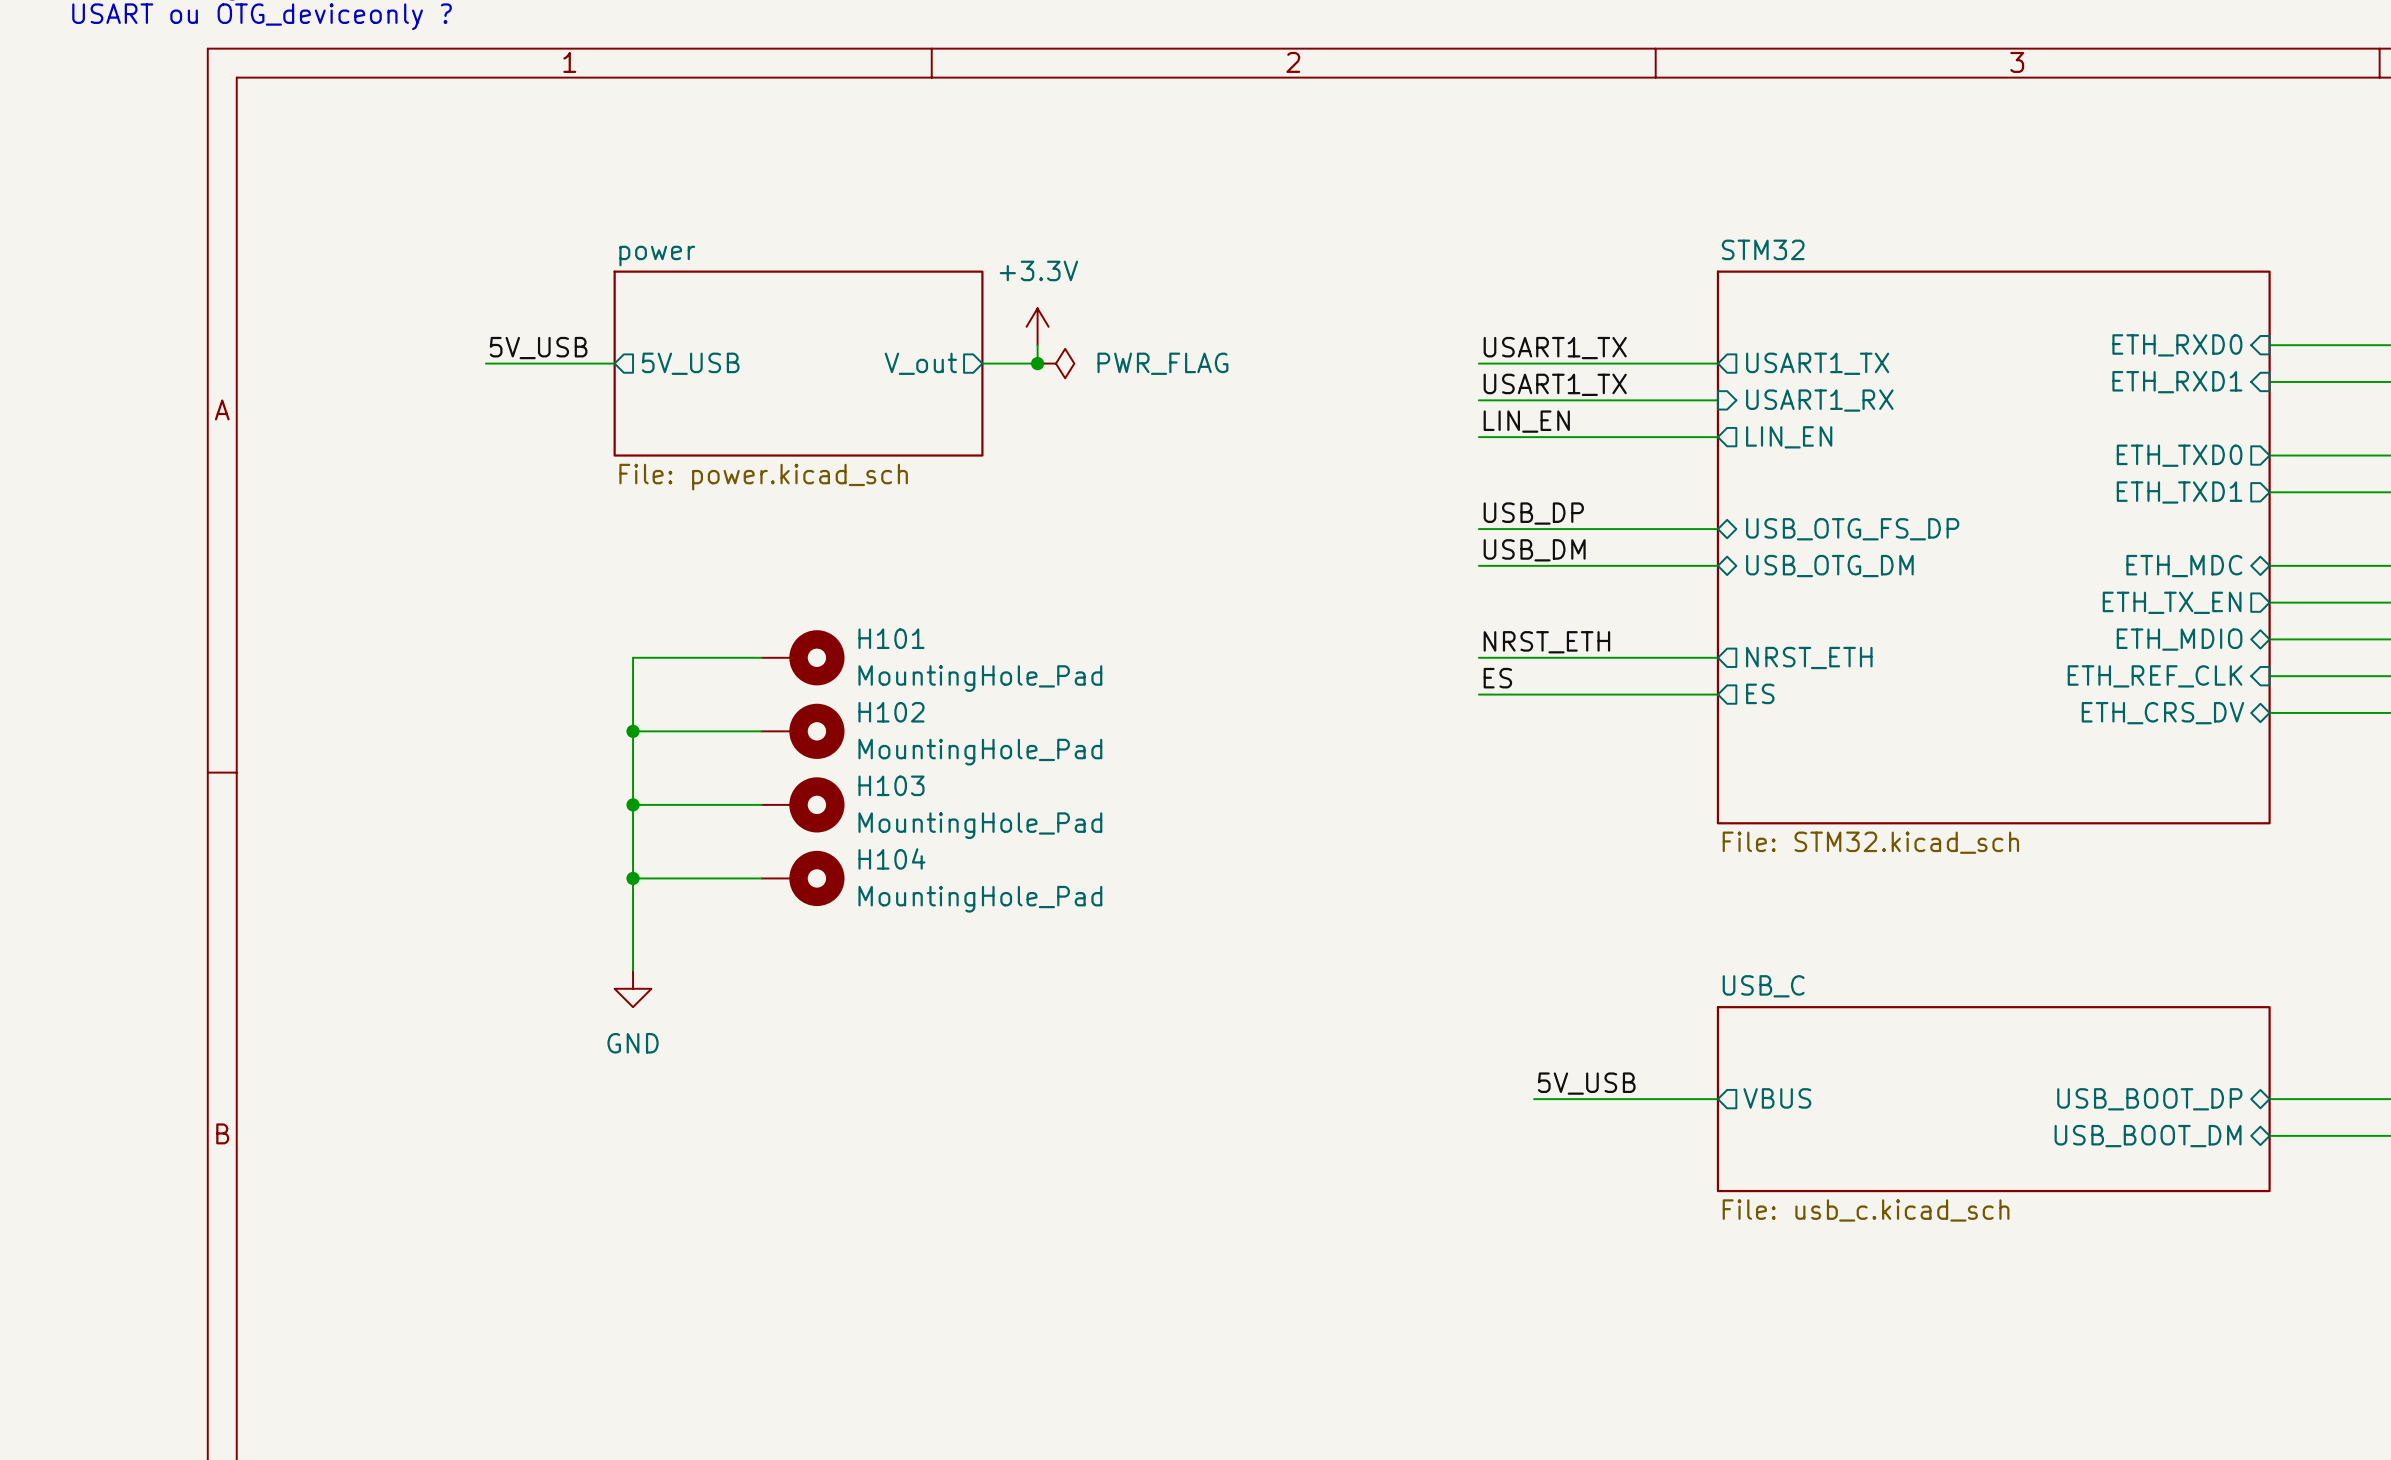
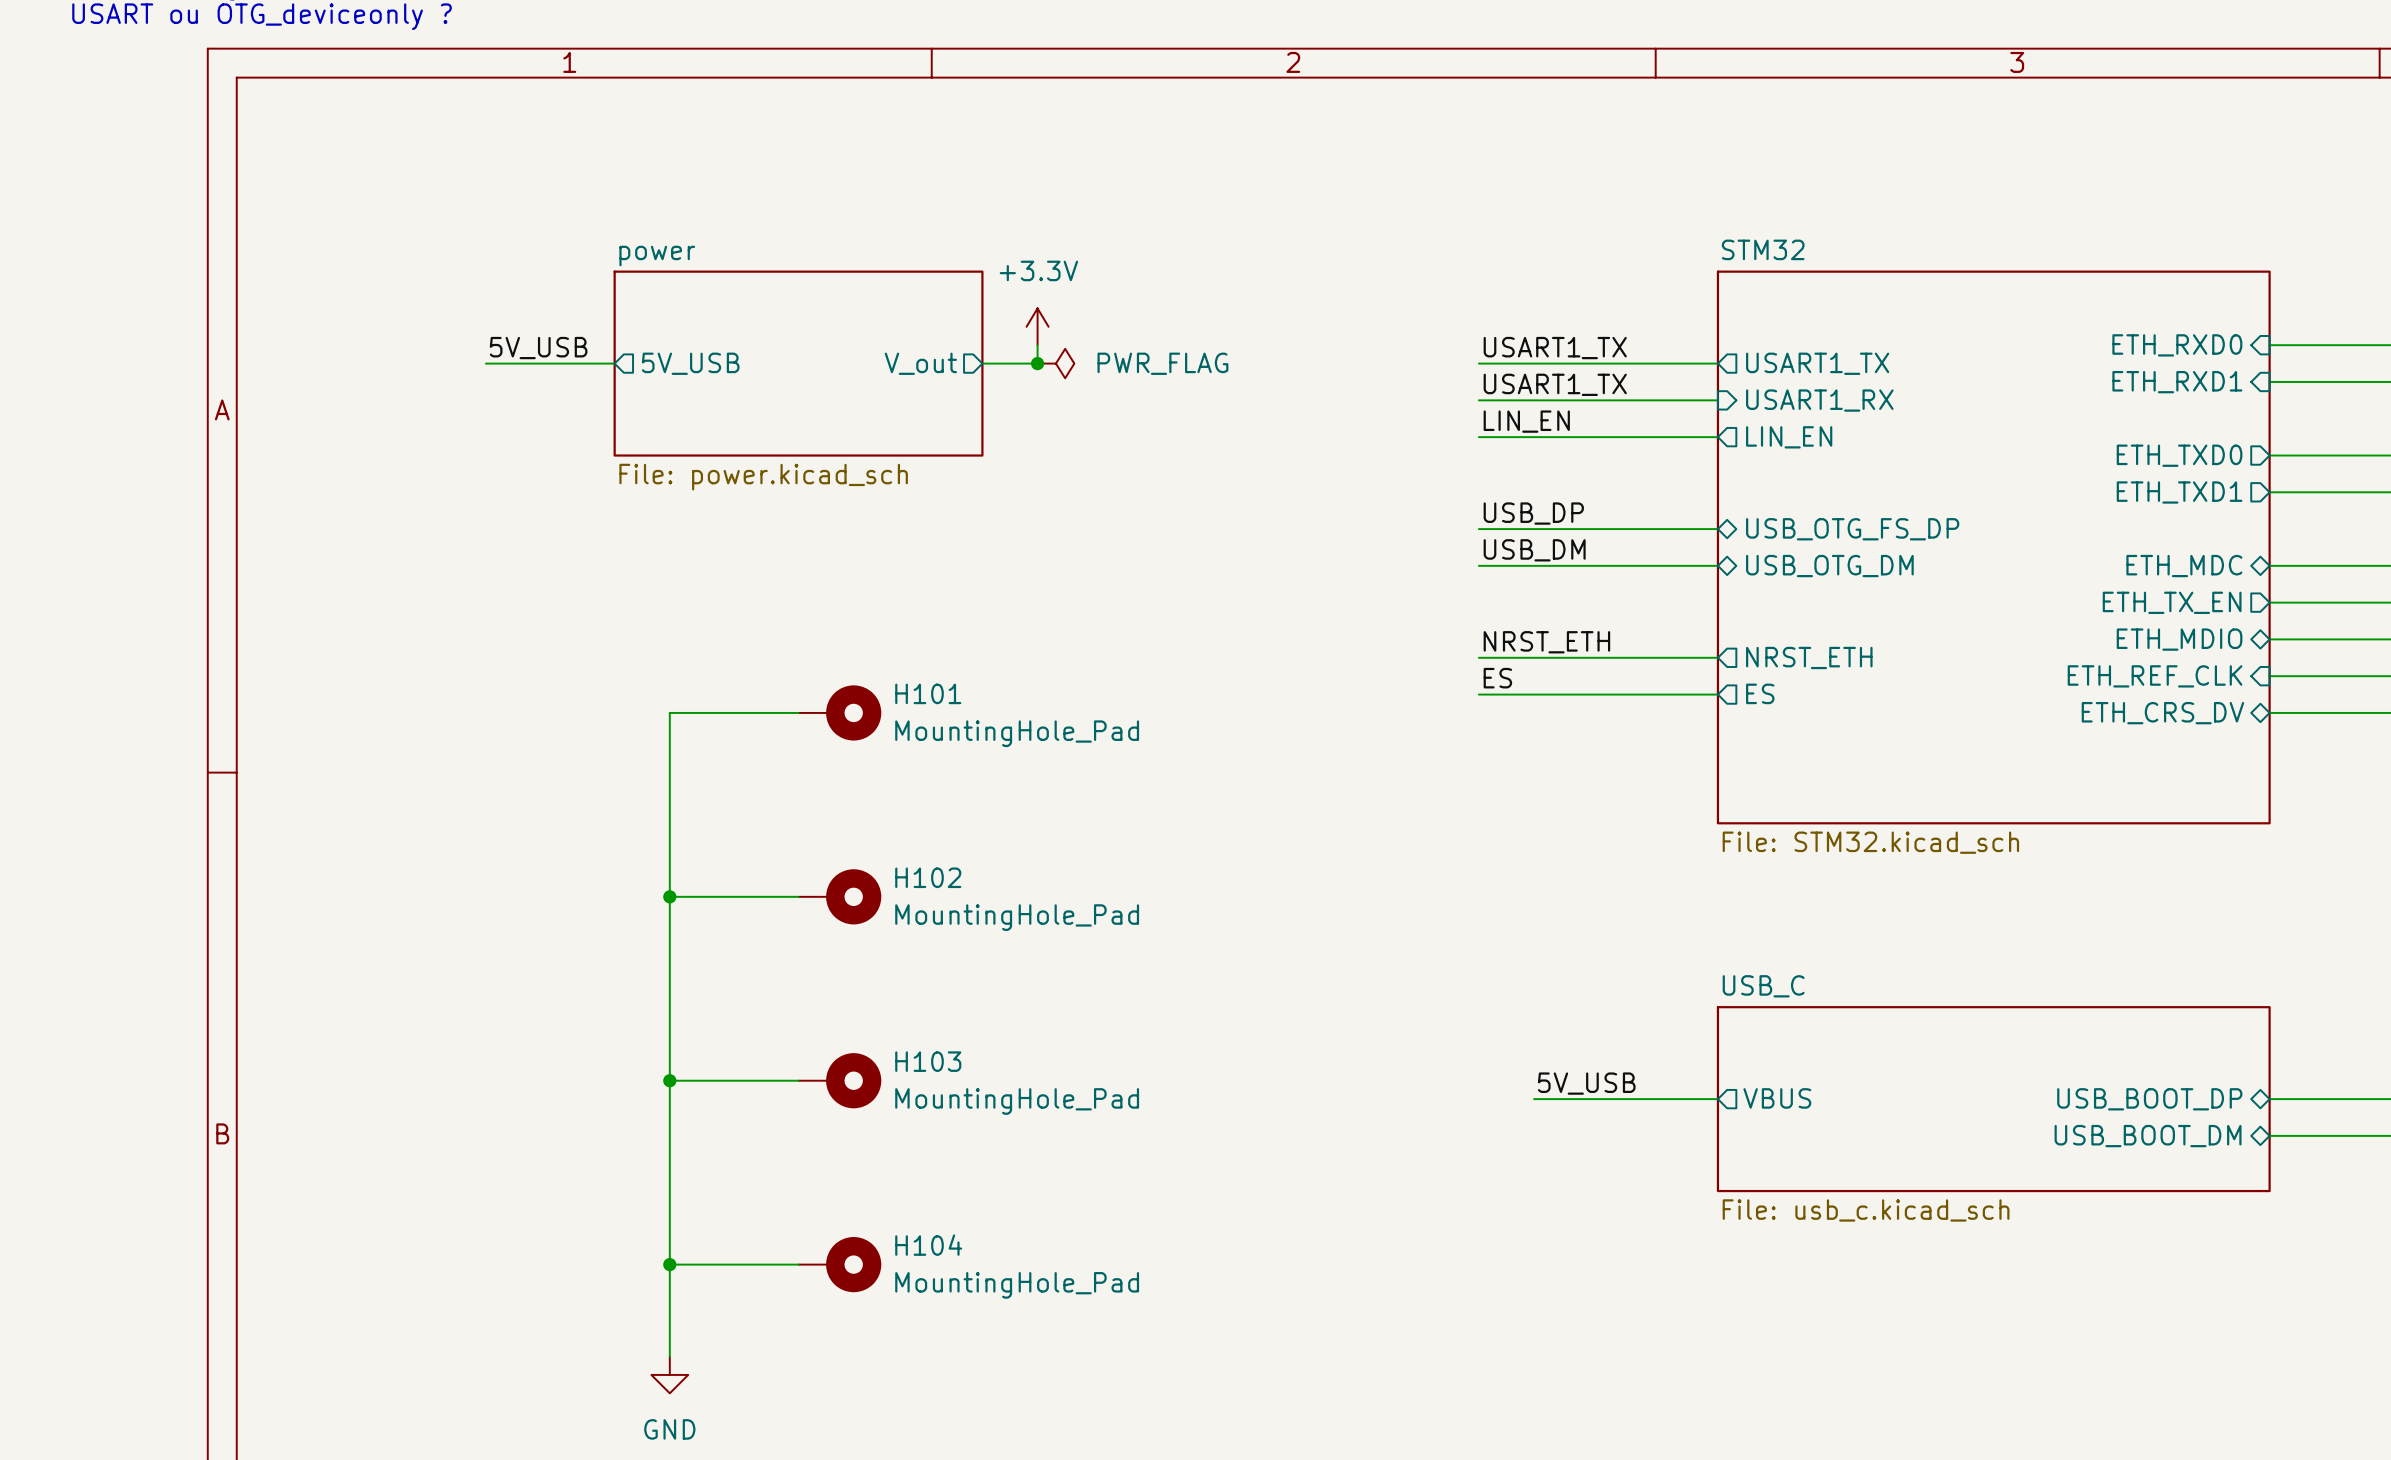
wire: (761, 657) (633, 657) (633, 970) -> none
H101 position: (803, 657) -> (839, 712)
wire: none -> (798, 712) (669, 712) (669, 1356)
wire: (633, 731) (761, 731) -> none
junction: (633, 731) -> none
H102 position: (803, 731) -> (839, 896)
wire: (633, 804) (761, 804) -> (669, 1080) (798, 1080)
junction: (633, 804) -> none
H103 position: (803, 804) -> (839, 1080)
wire: (633, 878) (761, 878) -> (669, 896) (798, 896)
junction position: (633, 878) -> (669, 896)
H104 position: (803, 878) -> (839, 1264)
power symbol: GND (633, 988) -> none
junction: none -> (669, 1080)
wire: none -> (669, 1264) (798, 1264)
junction: none -> (669, 1264)
power symbol: none -> GND (669, 1374)

